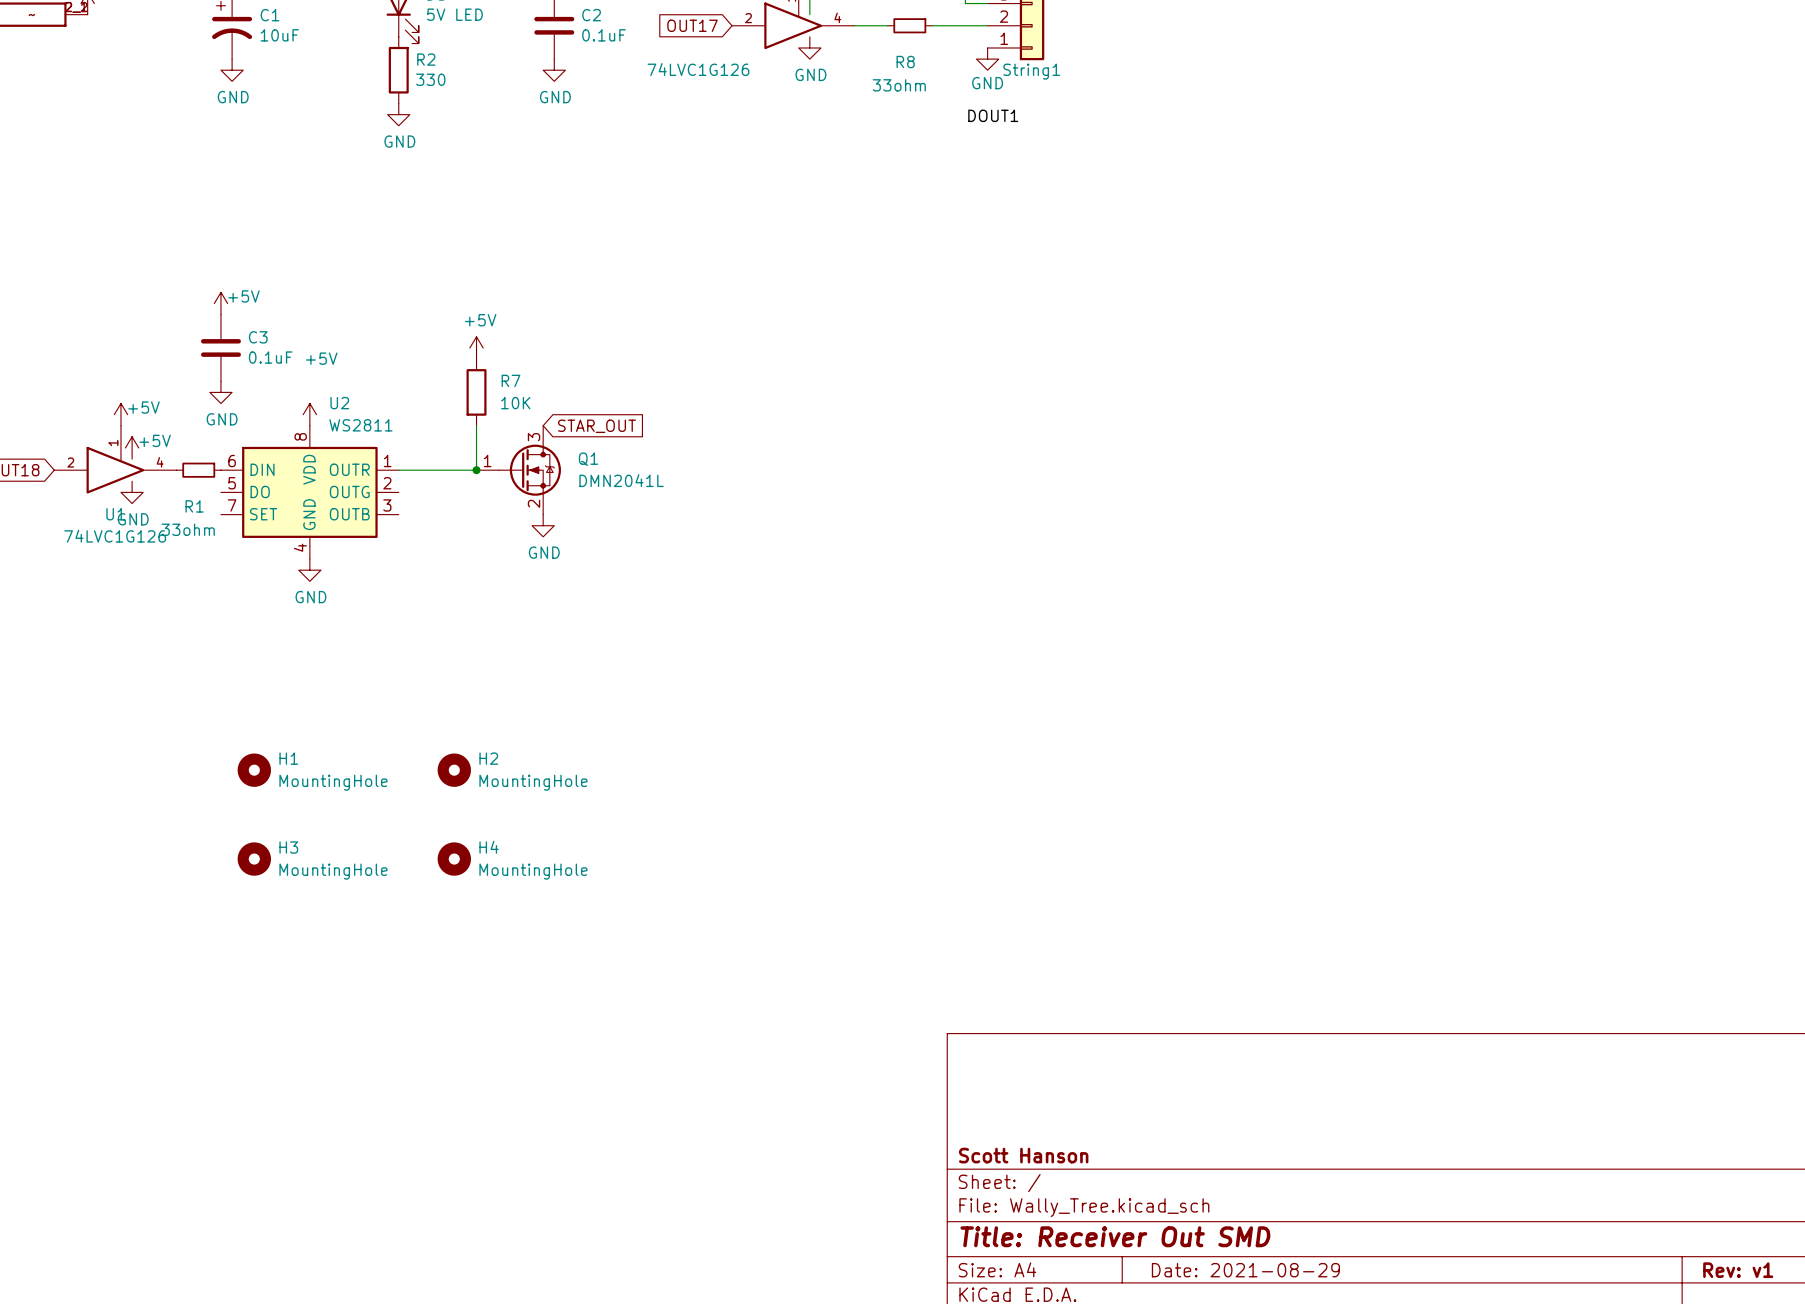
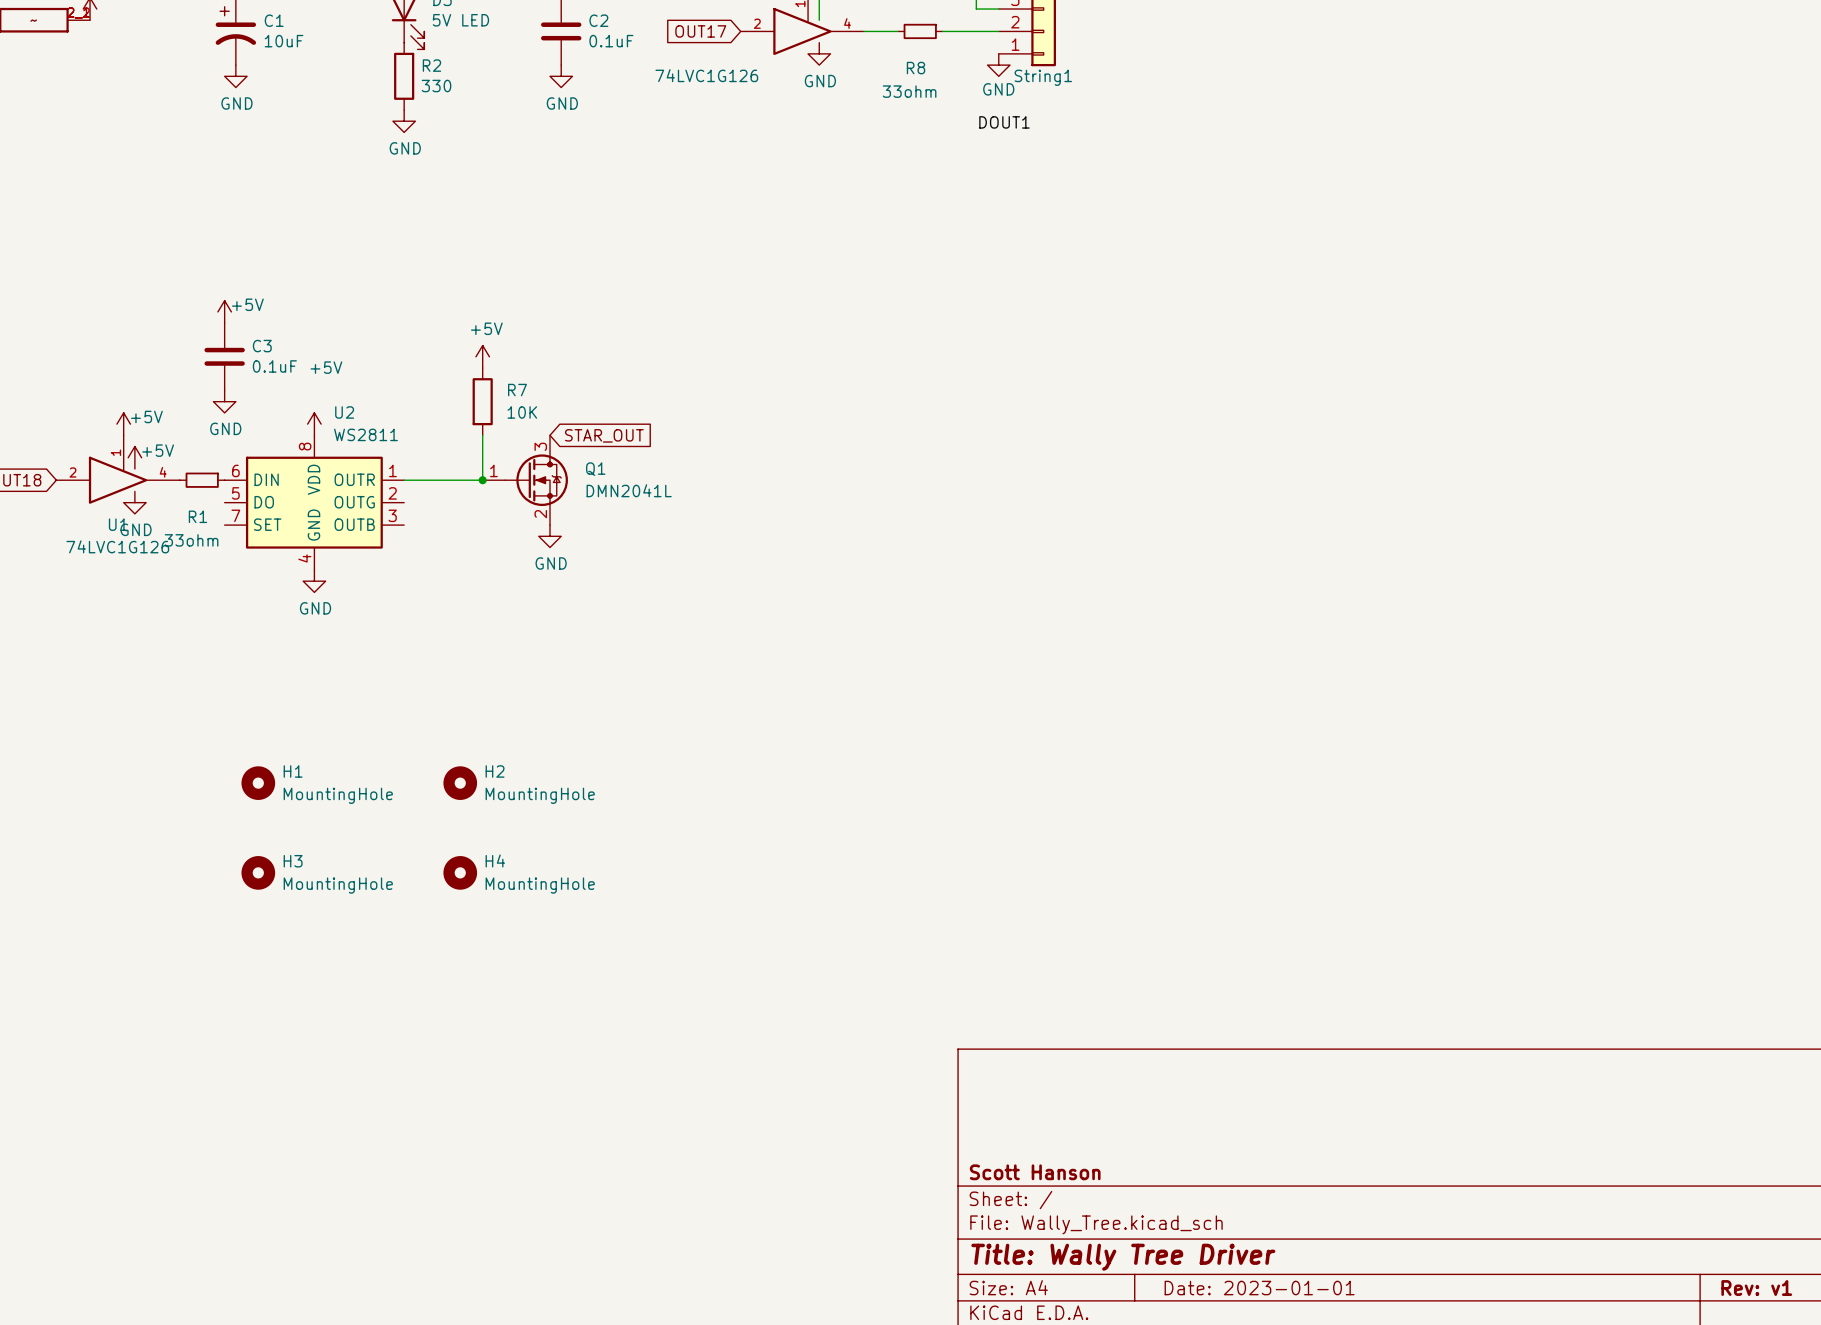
title block: Title: Receiver Out SMD (1115, 1236) -> Title: Wally Tree Driver (1123, 1257)
title block: Date: 2021-08-29 (1245, 1270) -> Date: 2023-01-01 (1259, 1288)

